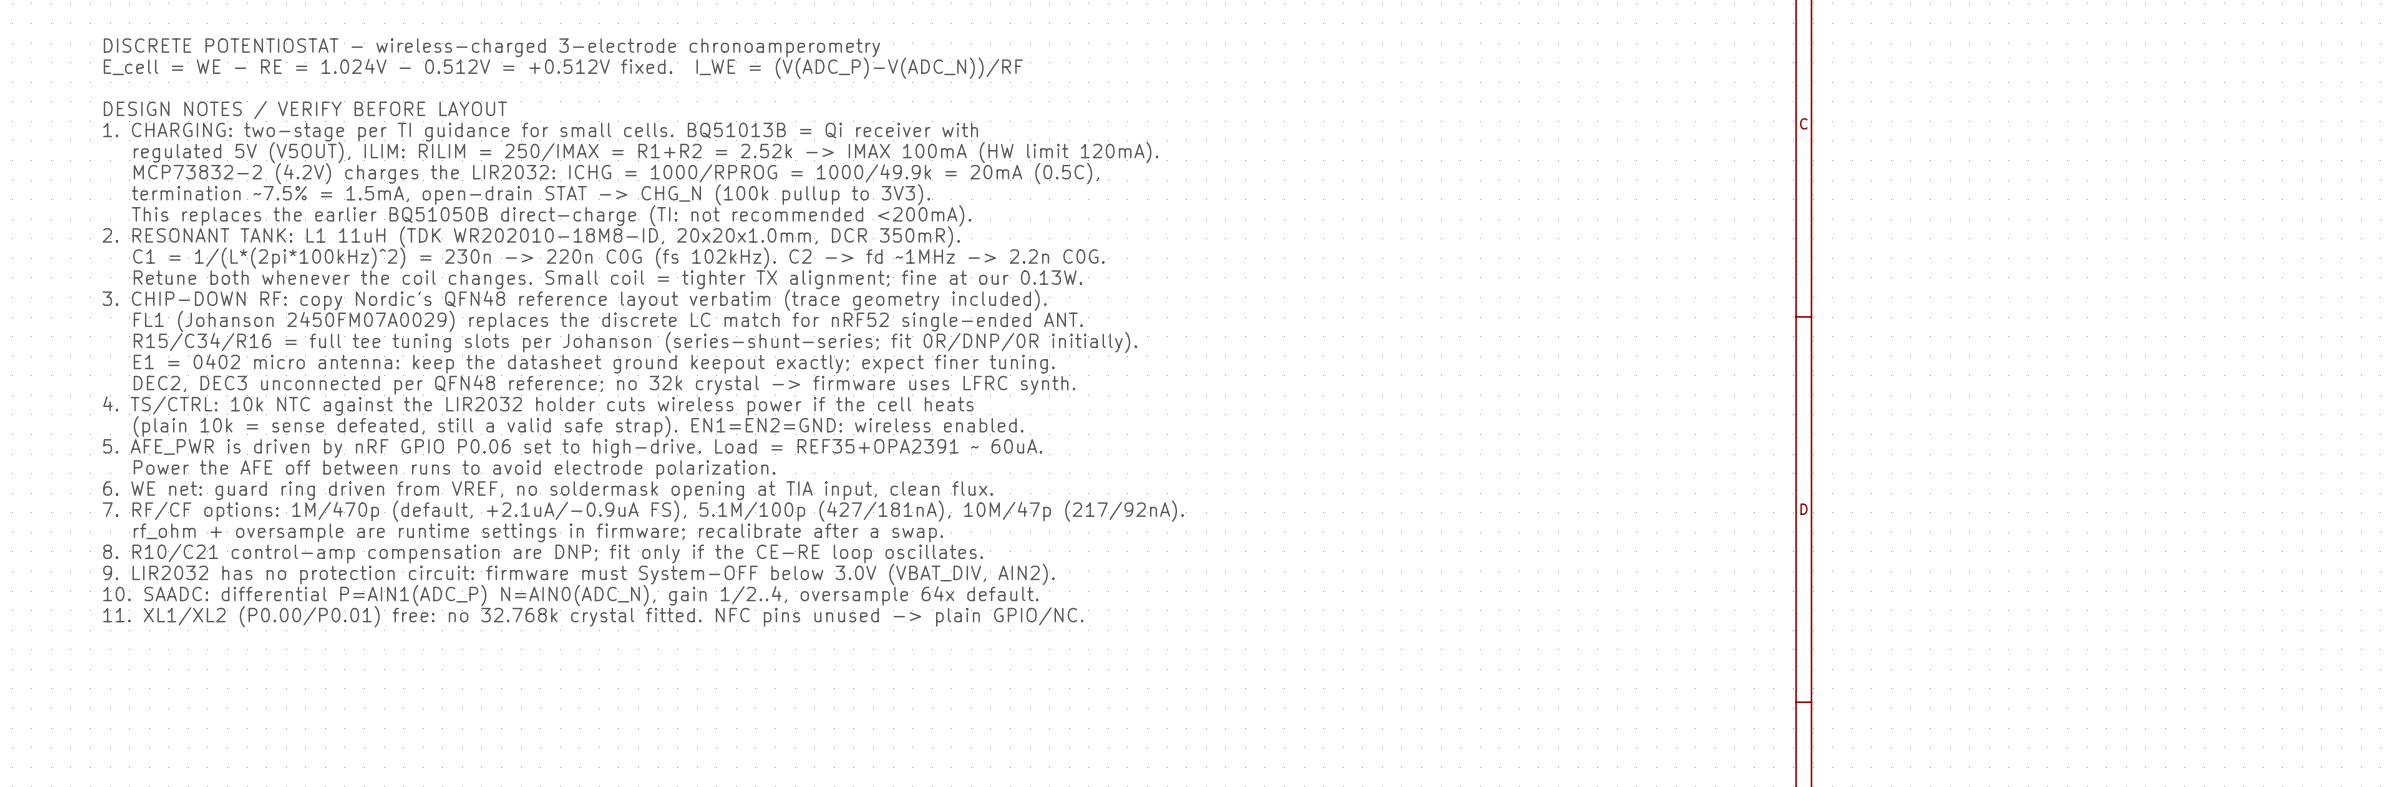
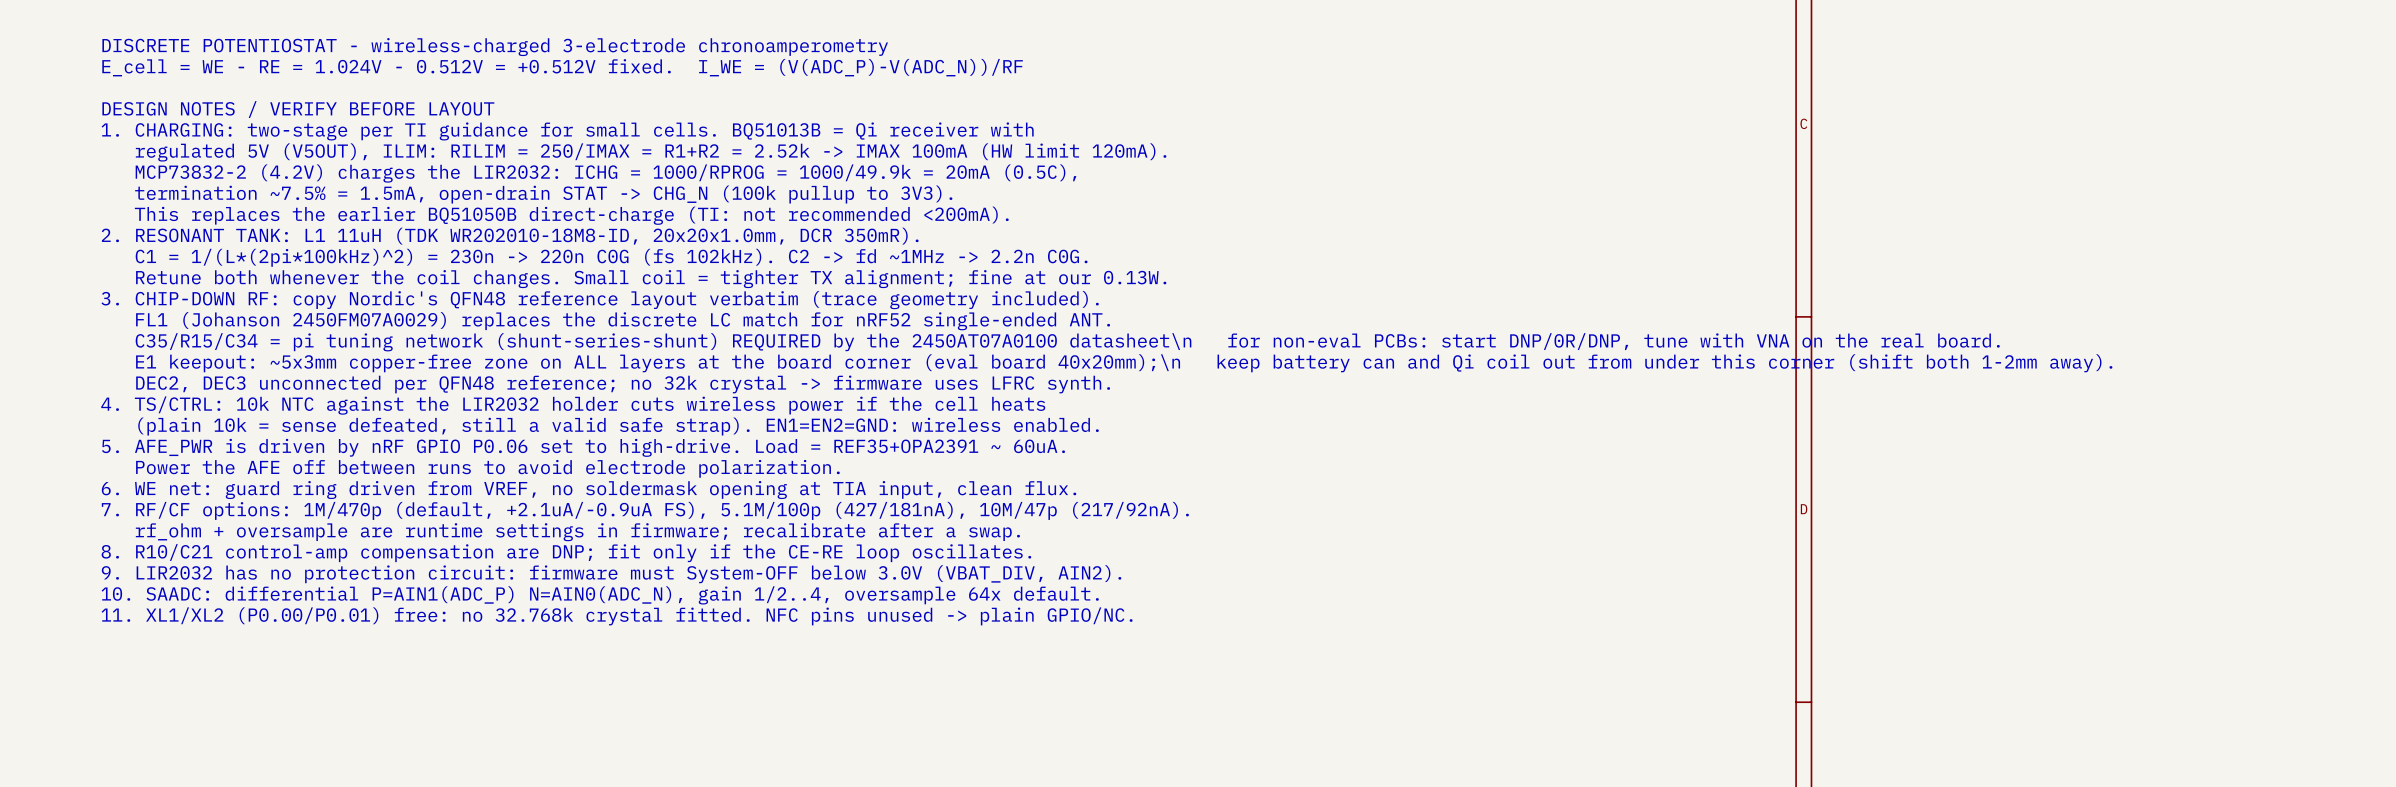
text: R15/C34/R16 = full tee tuning slots per Johanson (series-shunt-series; fit 0R/DNP/0R initially). (635, 342) -> C35/R15/C34 = pi tuning network (shunt-series-shunt) REQUIRED by the 2450AT07A0100 datasheet\n for non-eval PCBs: start DNP/0R/DNP, tune with VNA on the real board. (1067, 342)
text: E1 = 0402 micro antenna: keep the datasheet ground keepout exactly; expect finer tuning. (594, 363) -> E1 keepout: ~5x3mm copper-free zone on ALL layers at the board corner (eval board 40x20mm);\n keep battery can and Qi coil out from under this corner (shift both 1-2mm away). (1124, 363)

